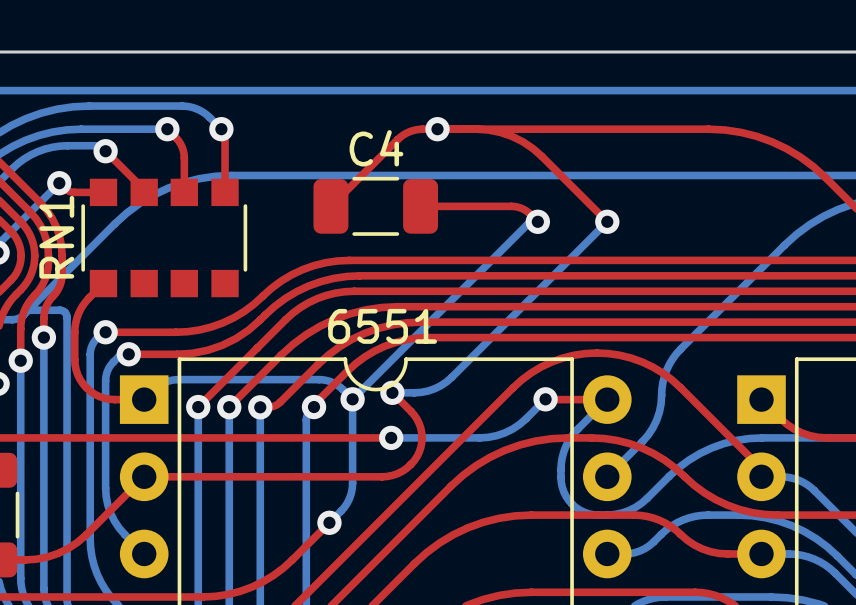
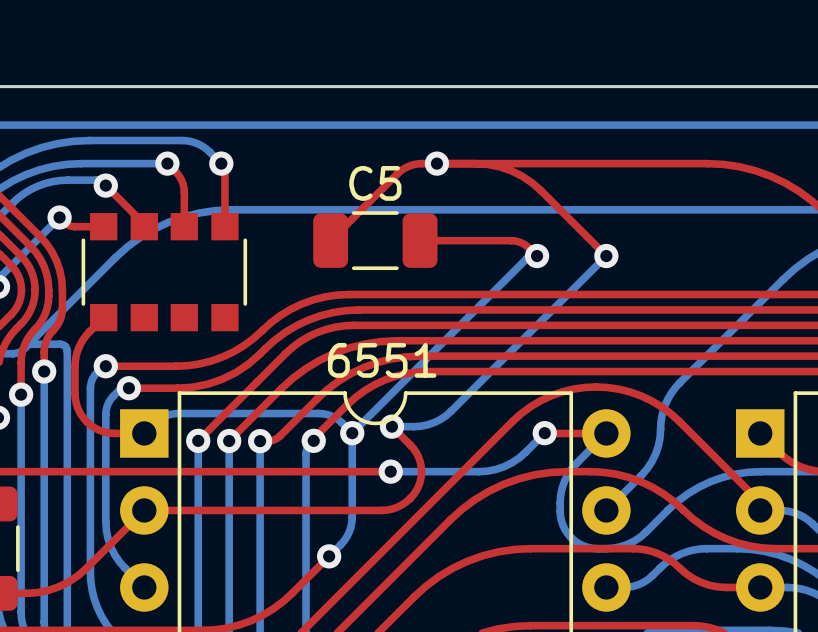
C4 name: C4 (376, 148) -> C5 (375, 183)
RN1 name: RN1 (56, 237) -> none

